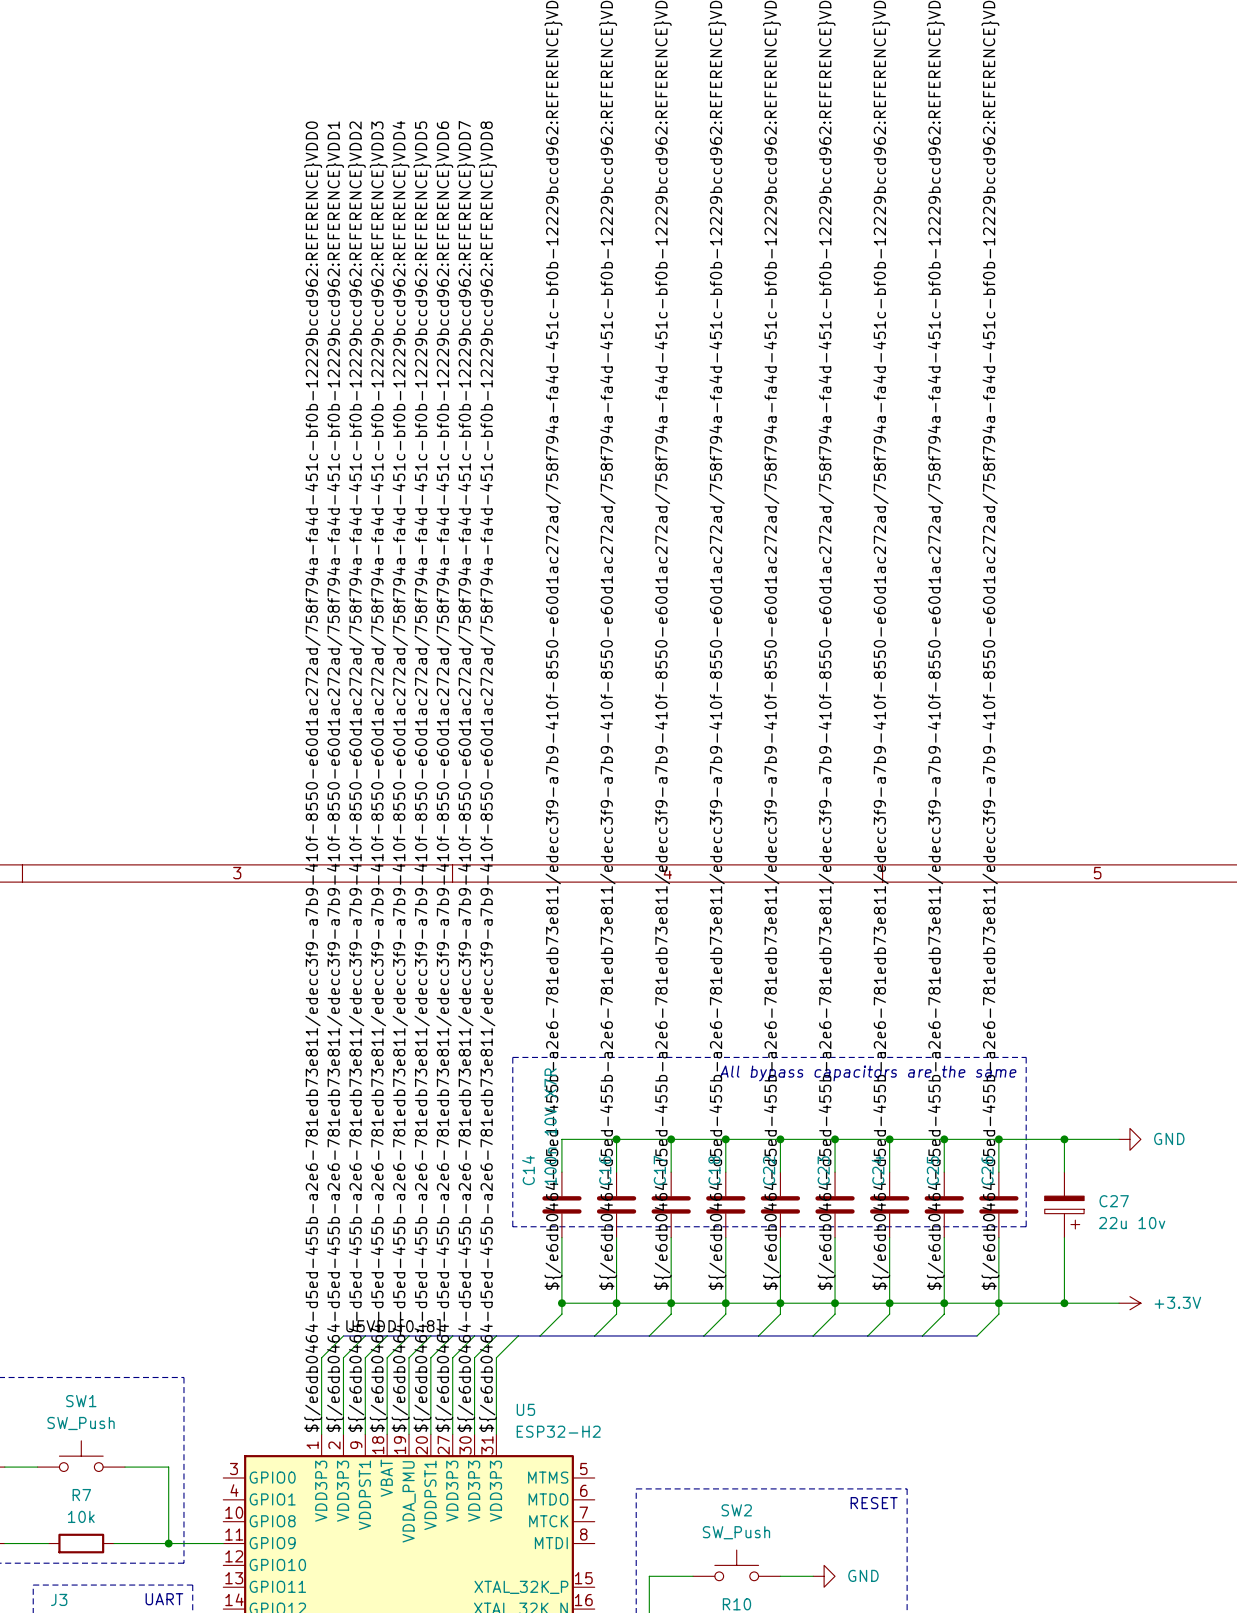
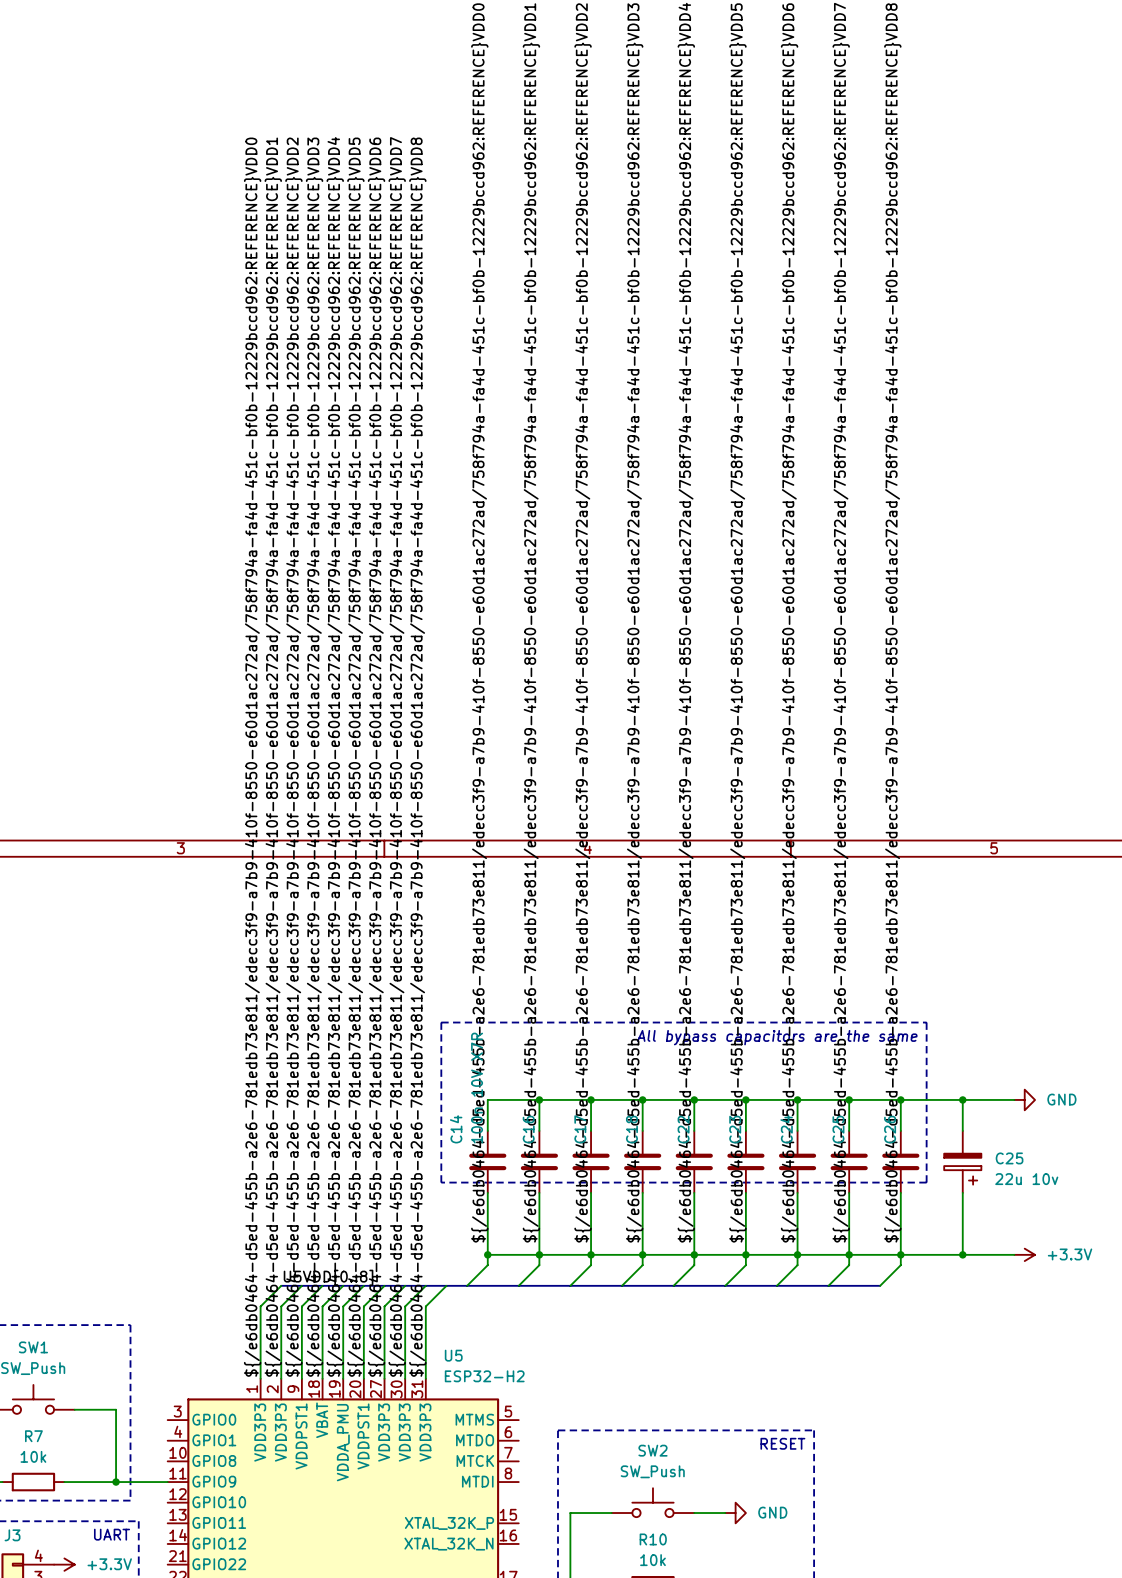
C27 name: C27 (1114, 1201) -> C25 (1009, 1158)

